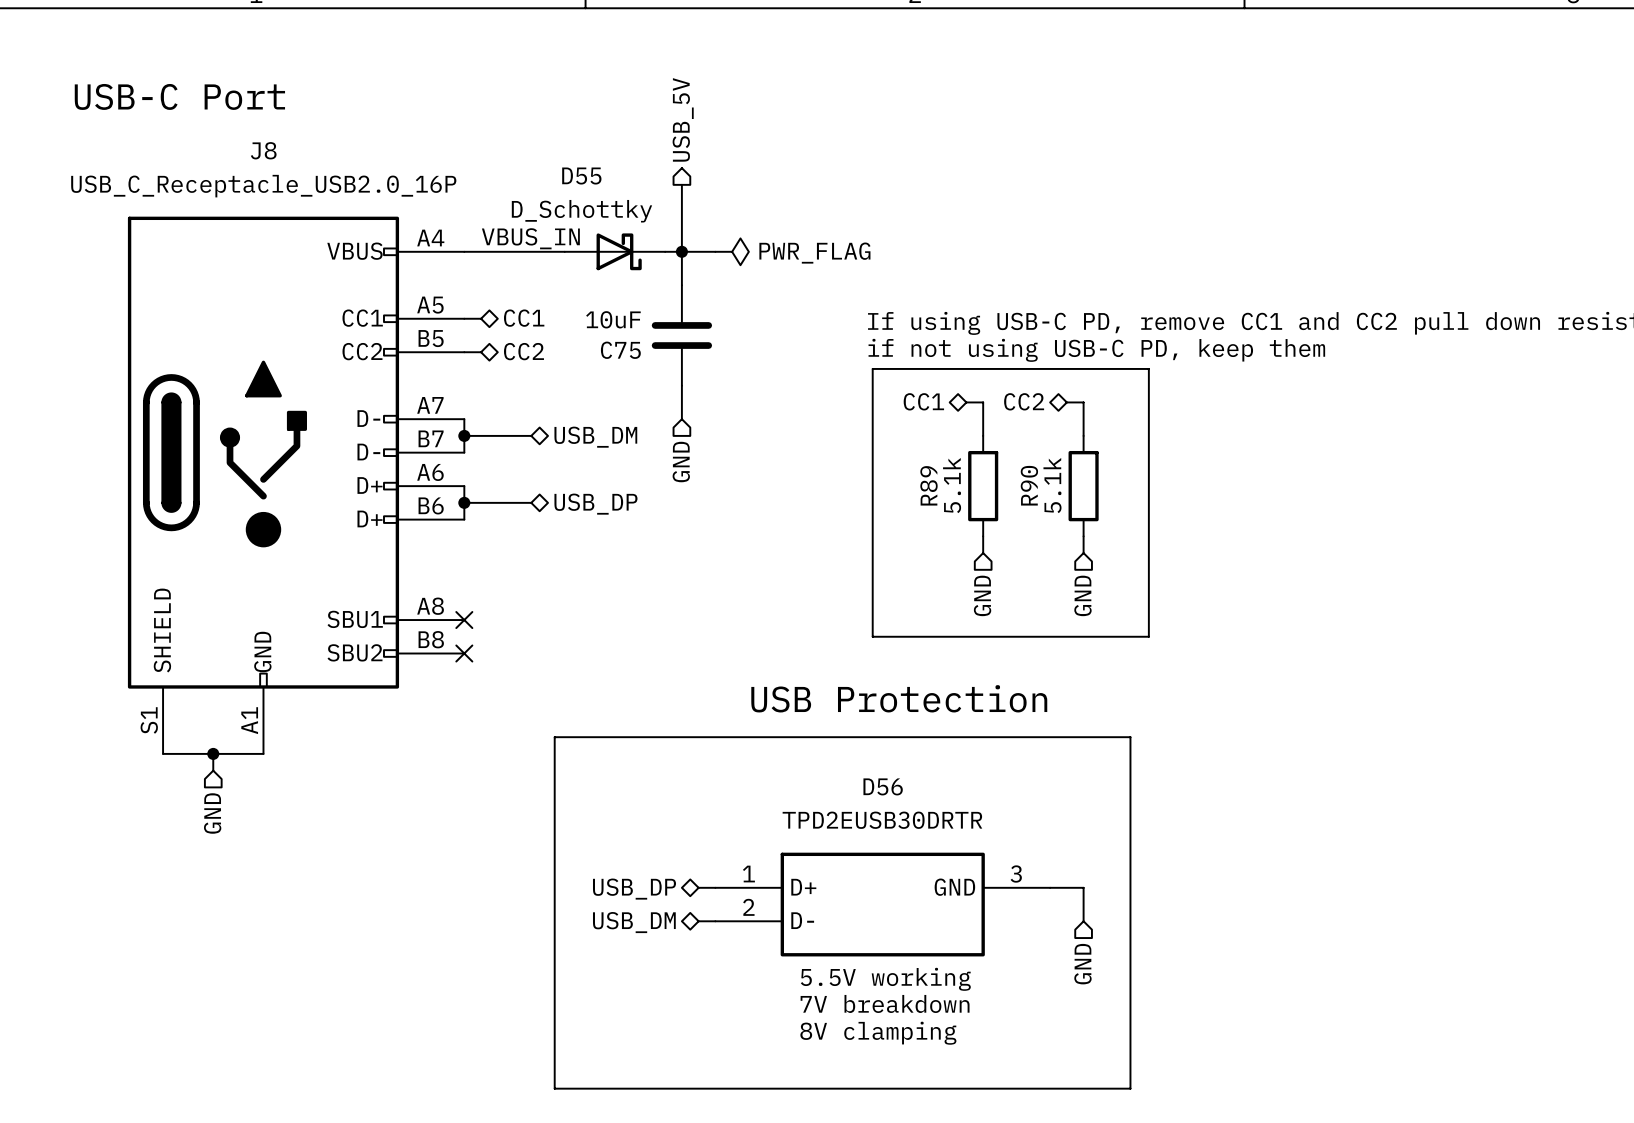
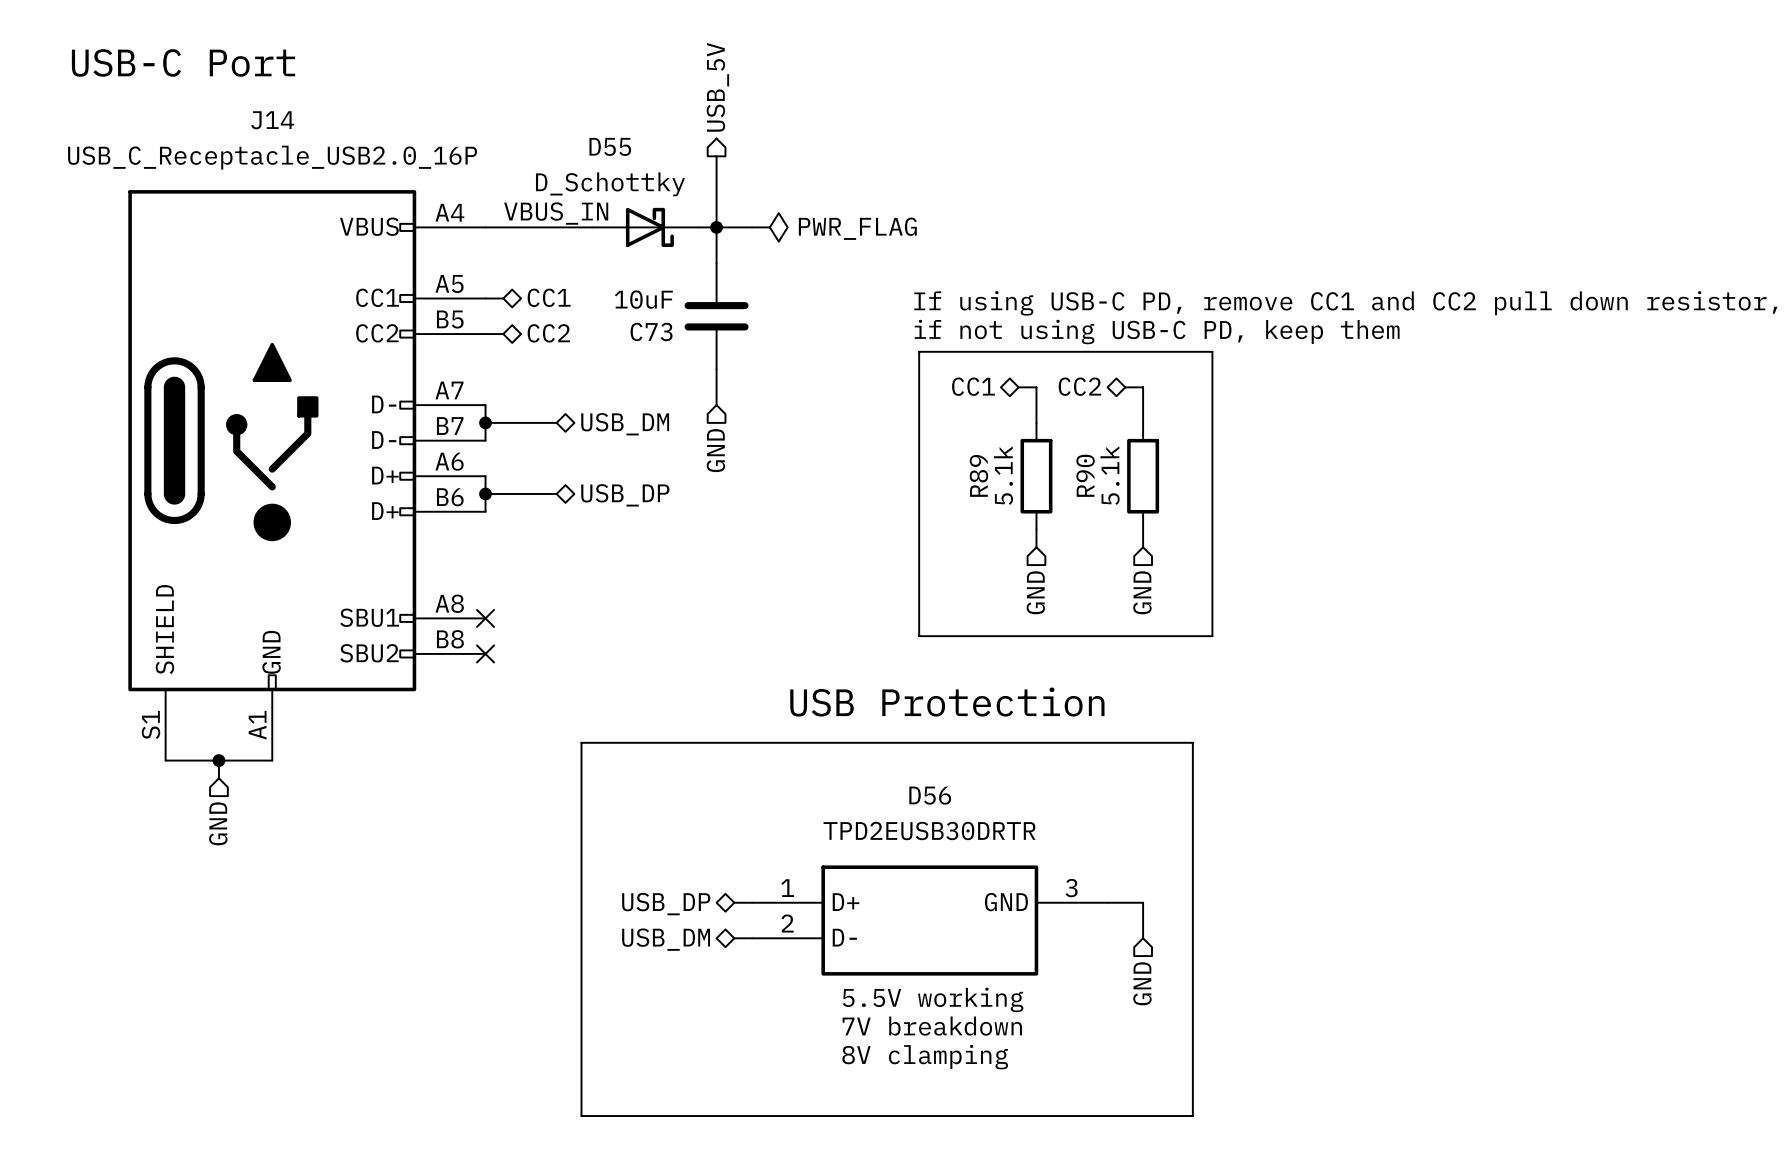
J8 name: J8 (263, 150) -> J14 (272, 120)
C75 name: C75 (620, 350) -> C73 (651, 331)

